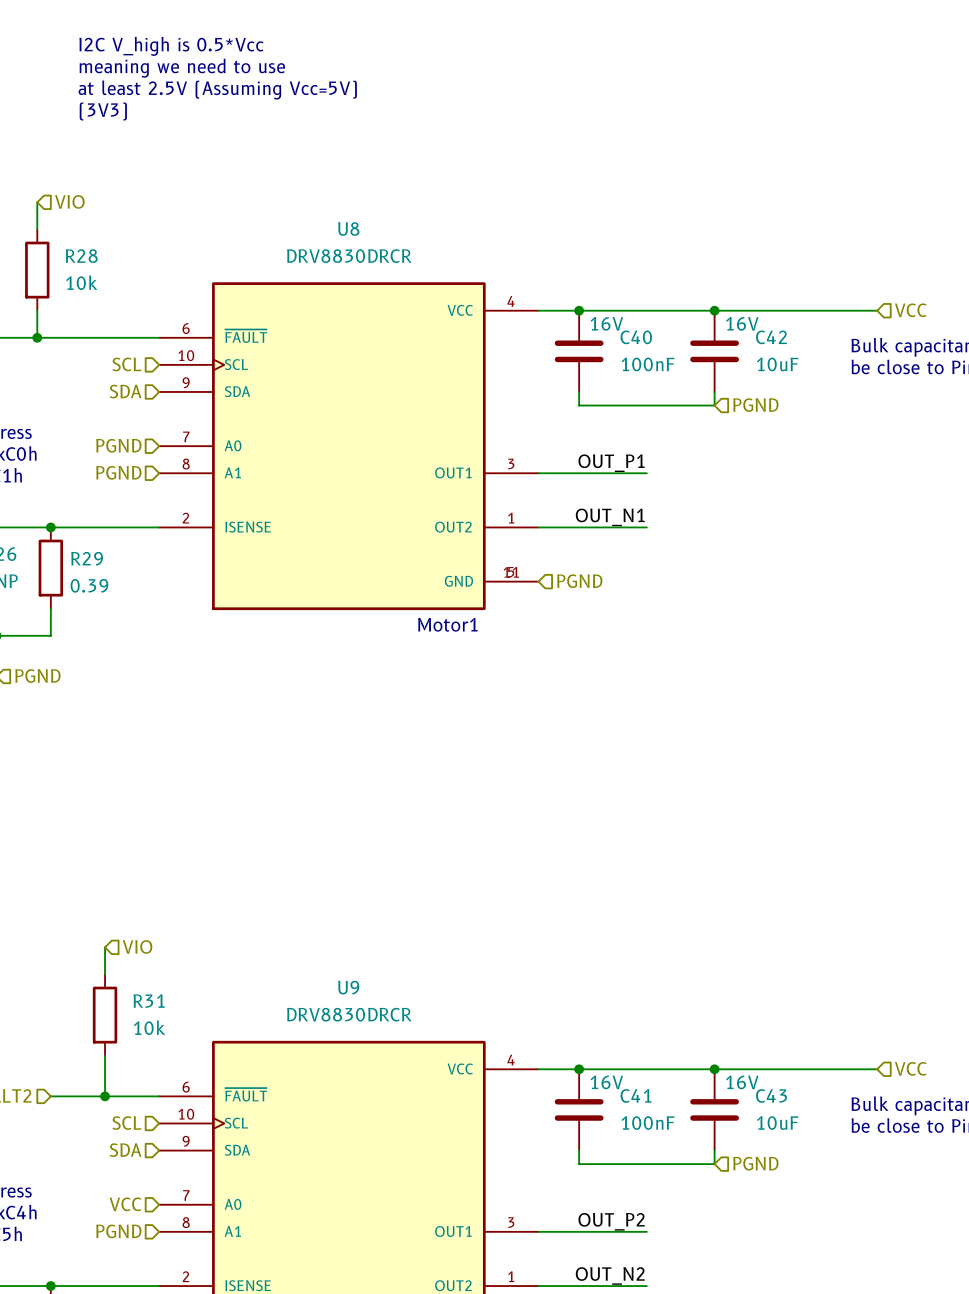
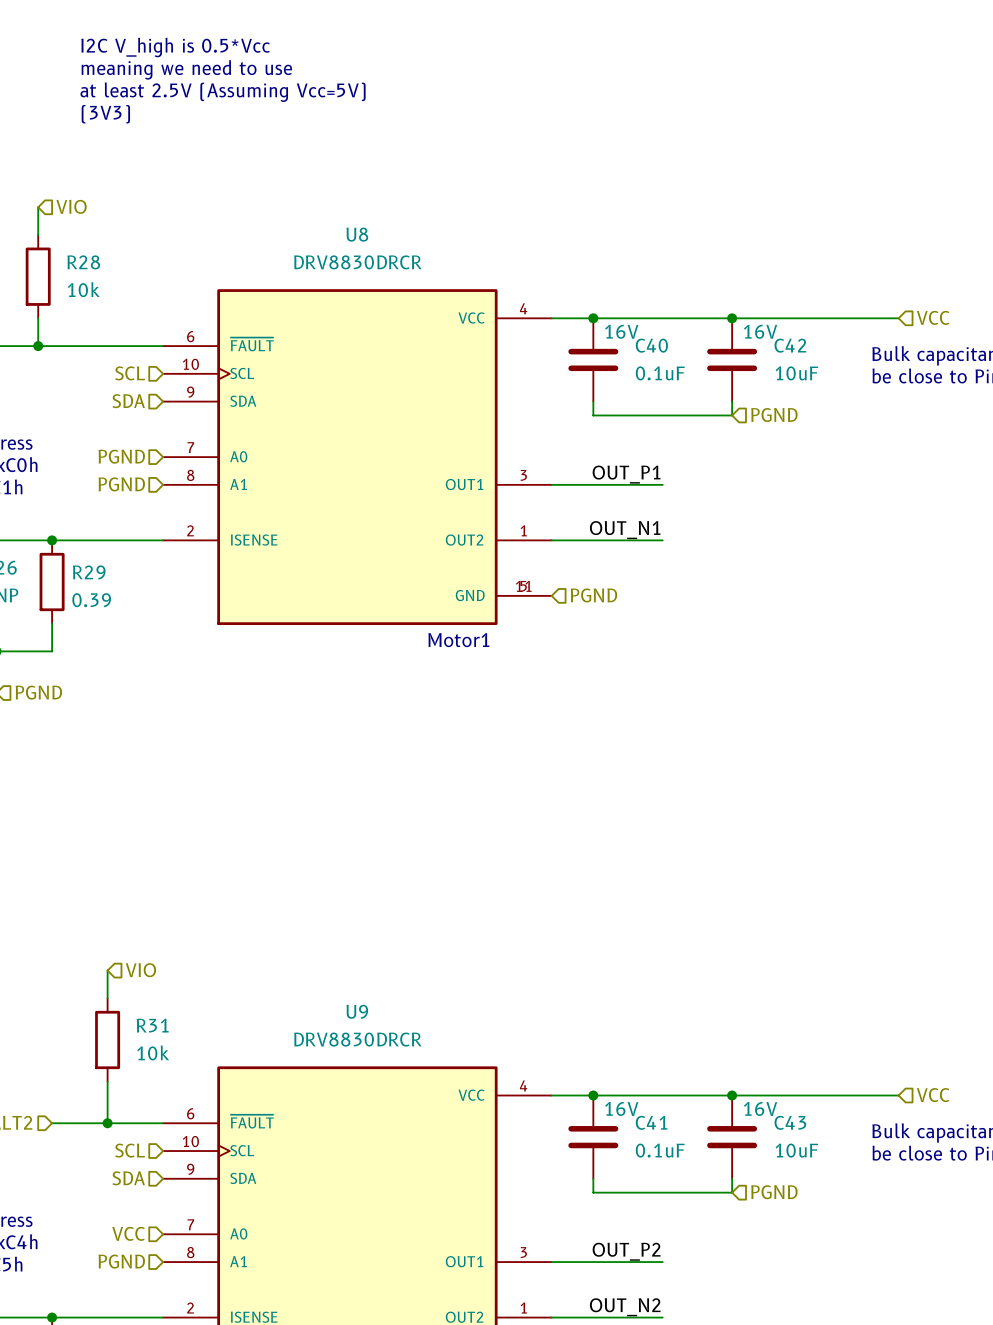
C40 value: 100nF (648, 364) -> 0.1uF (660, 373)
C41 value: 100nF (648, 1123) -> 0.1uF (660, 1150)

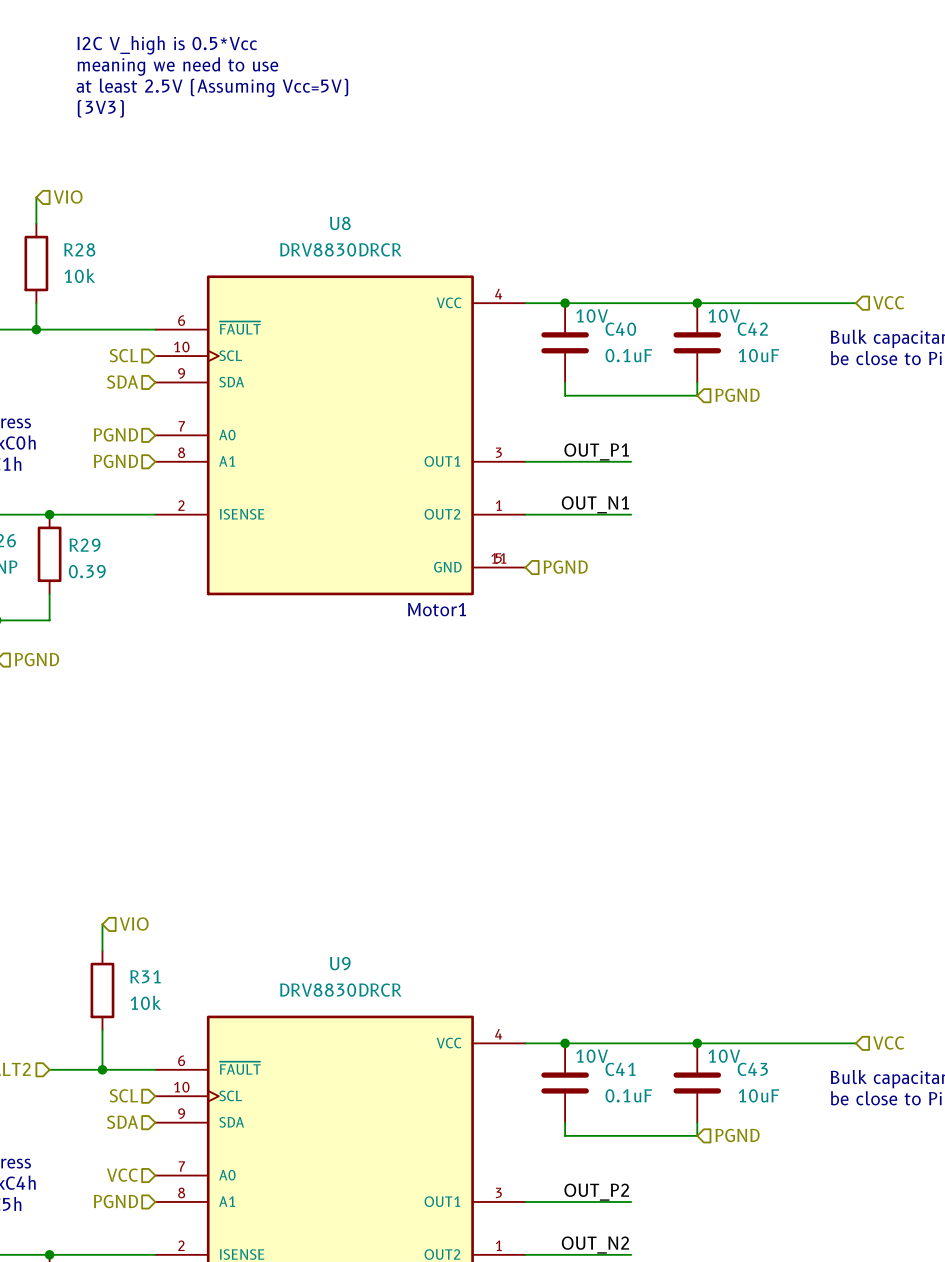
C40 text: 16V (621, 331) -> 10V (592, 315)
C42 text: 16V (760, 331) -> 10V (724, 315)
C41 text: 16V (621, 1108) -> 10V (592, 1056)
C43 text: 16V (760, 1108) -> 10V (724, 1056)

